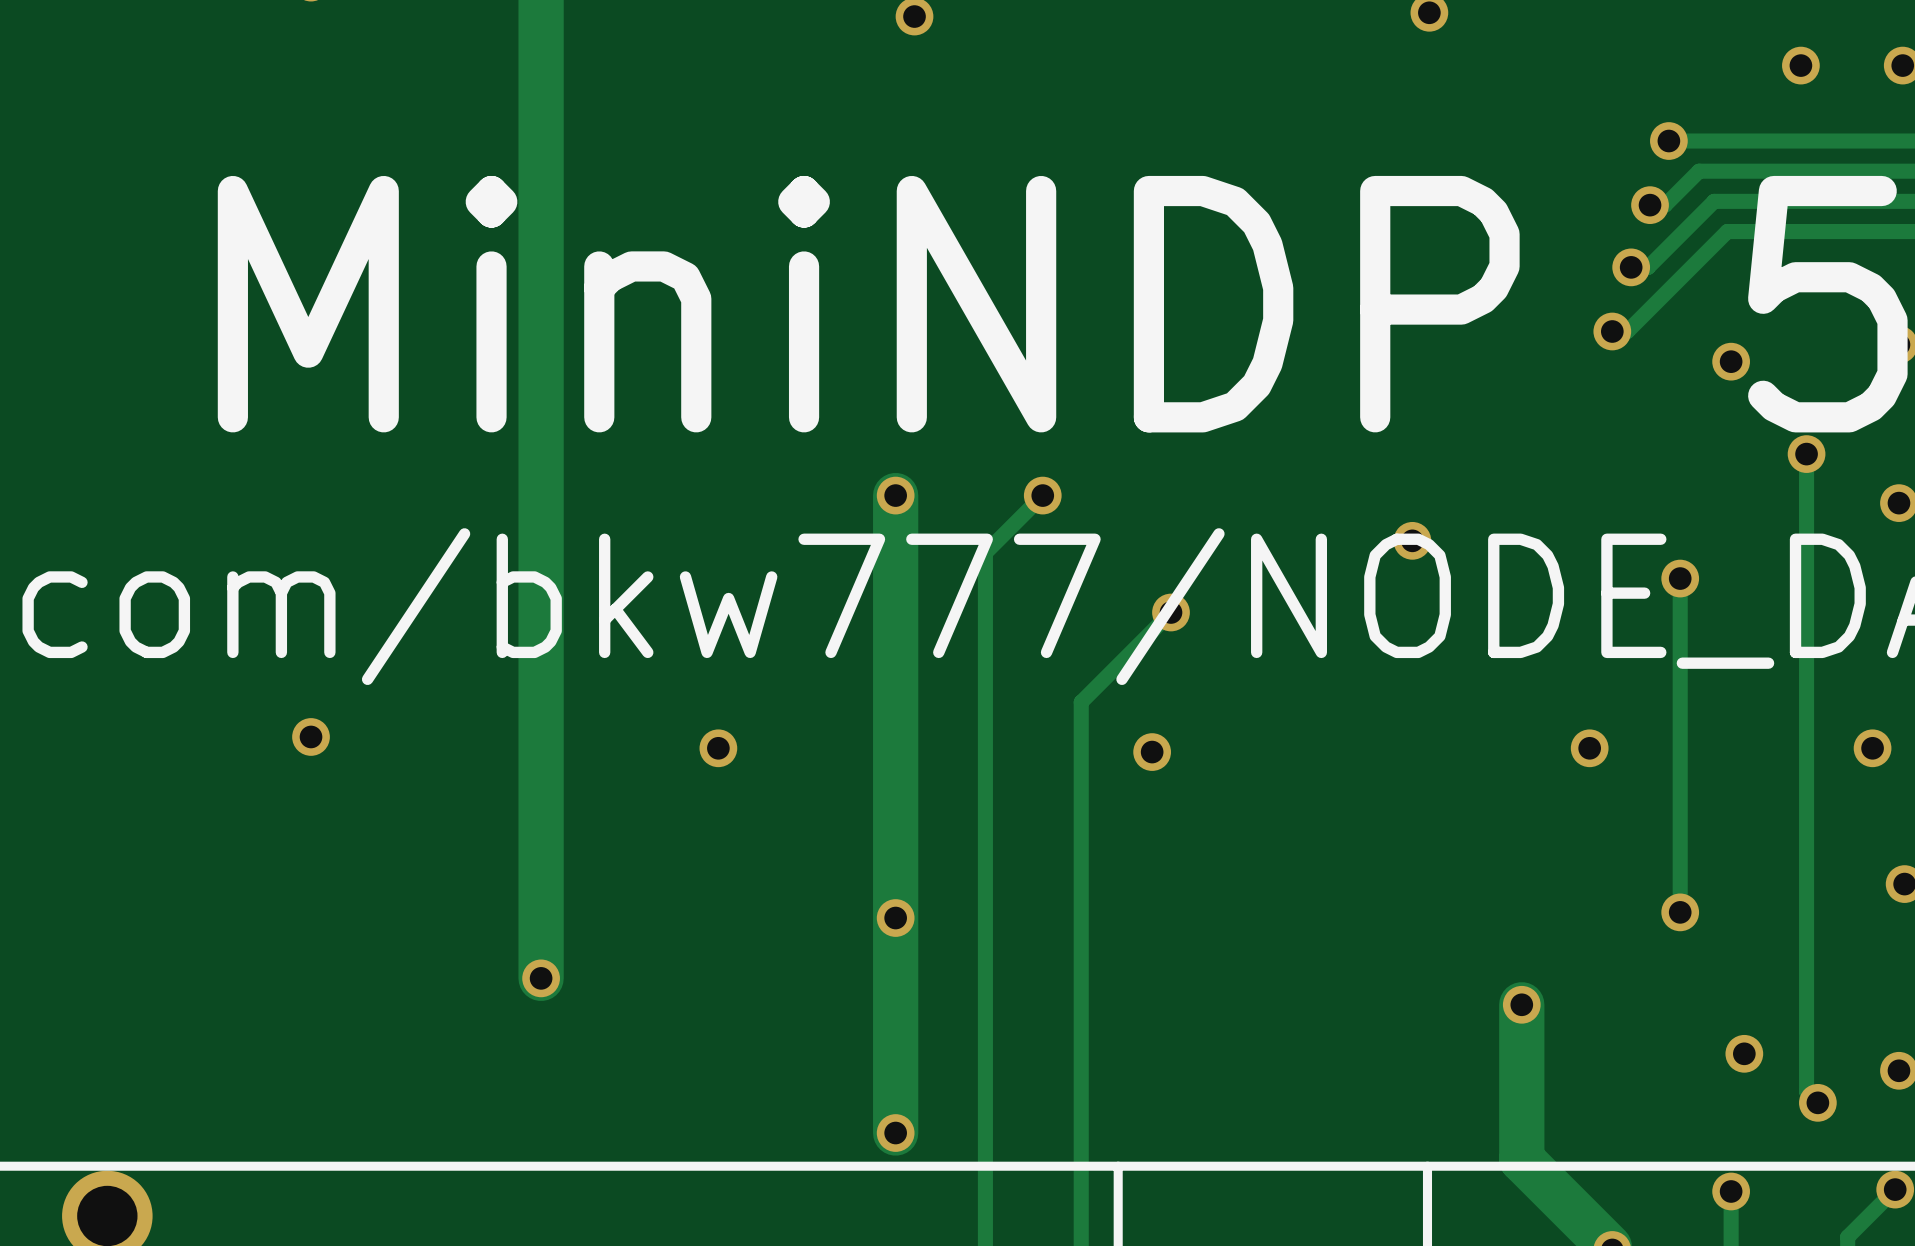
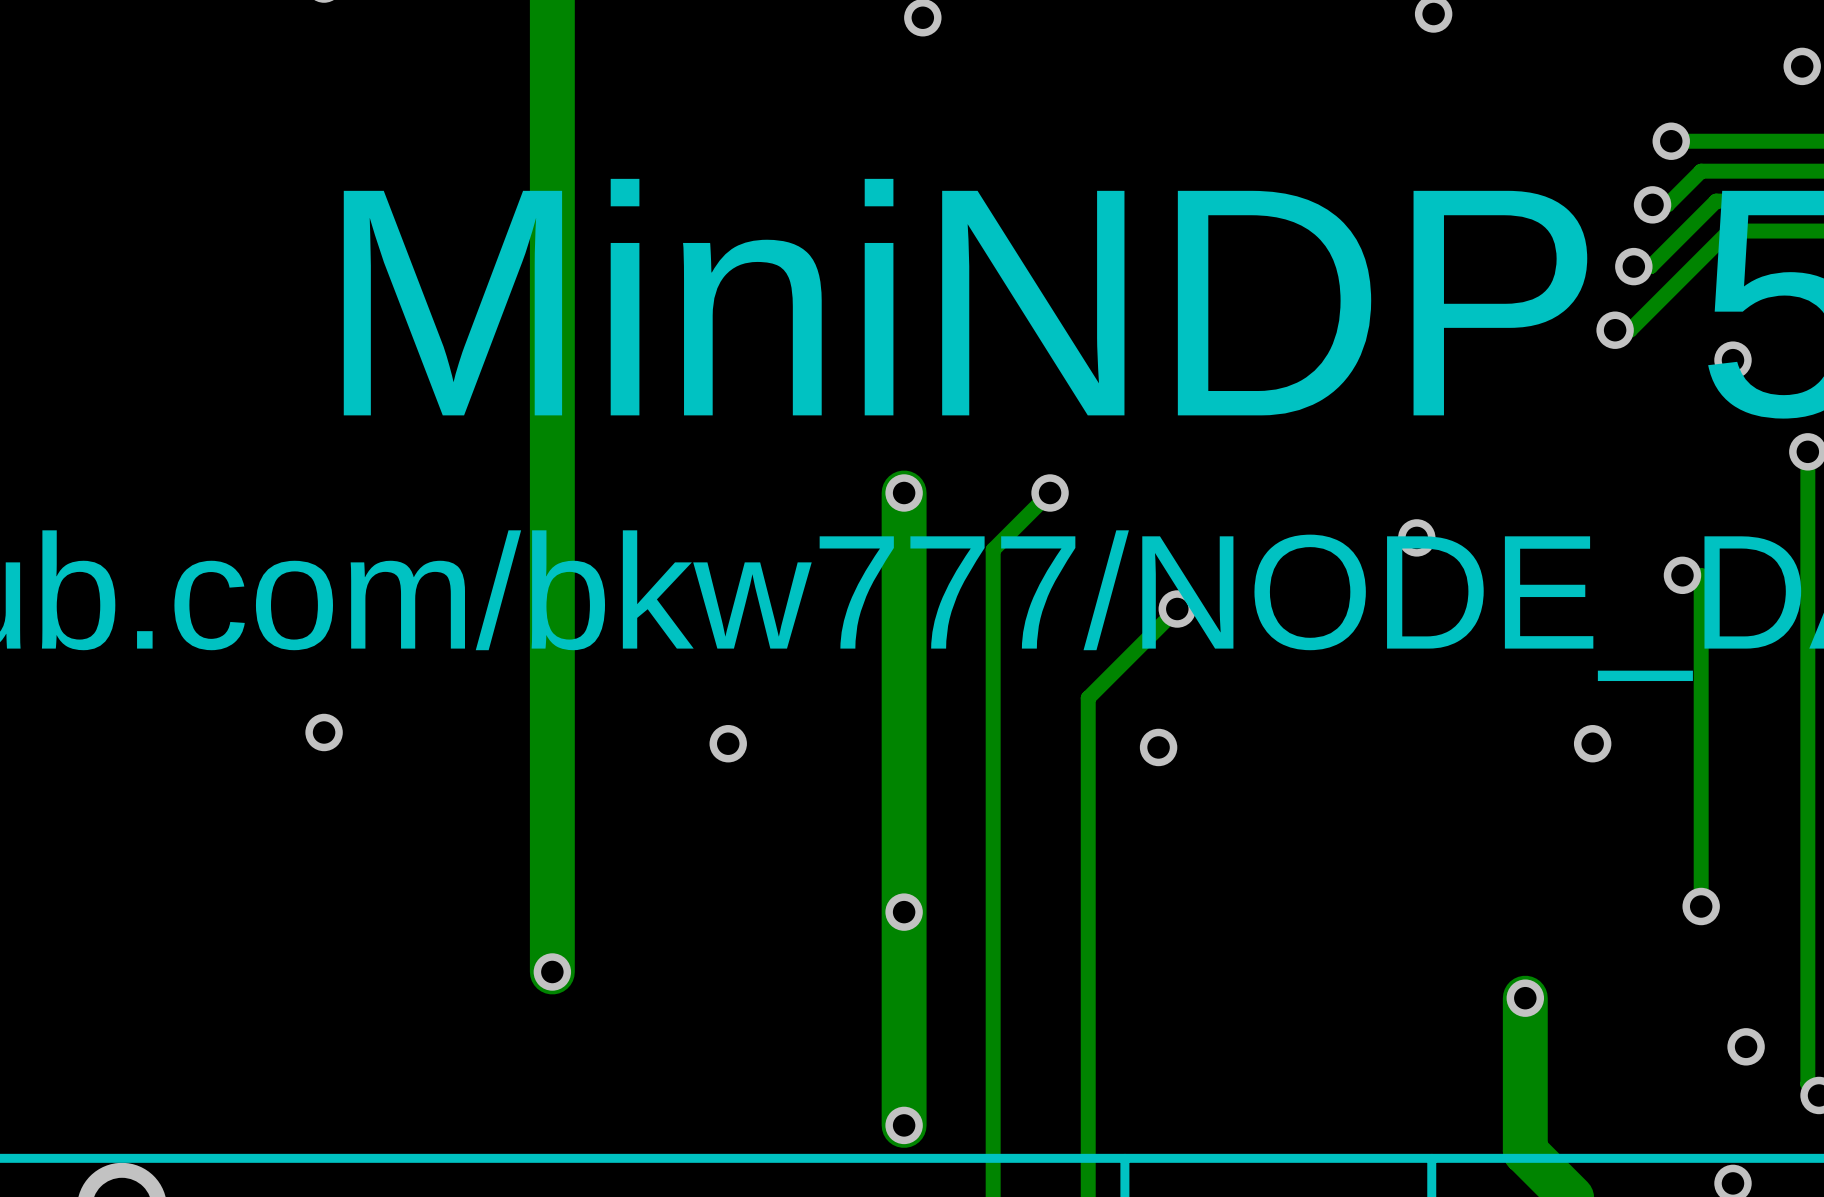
track: (1680, 578) (1680, 912) -> (1701, 575) (1701, 906)
via position: (1680, 912) -> (1701, 906)

